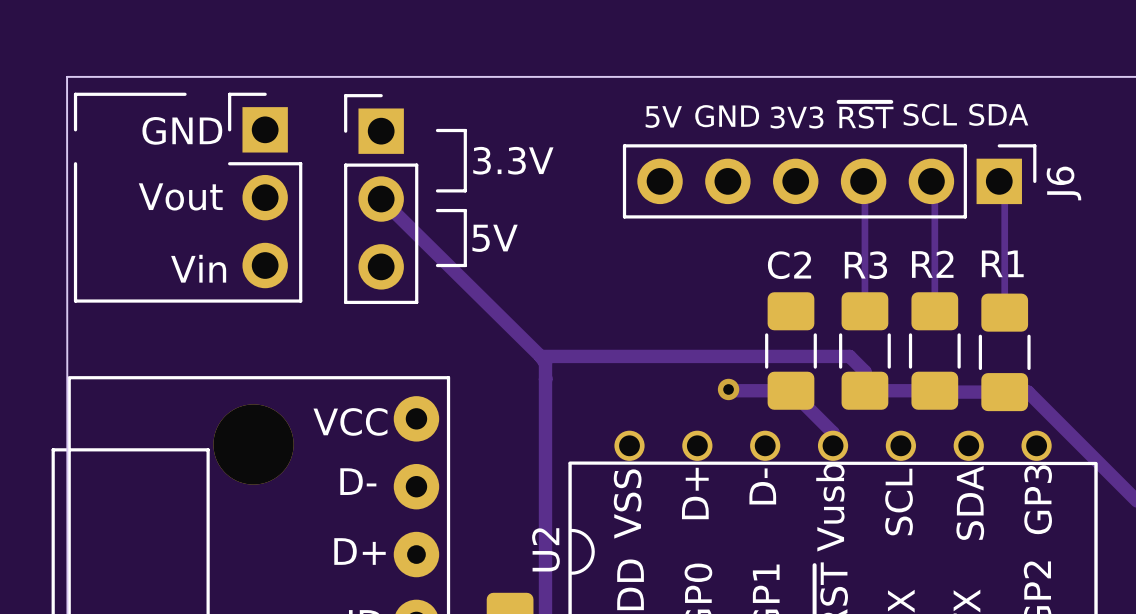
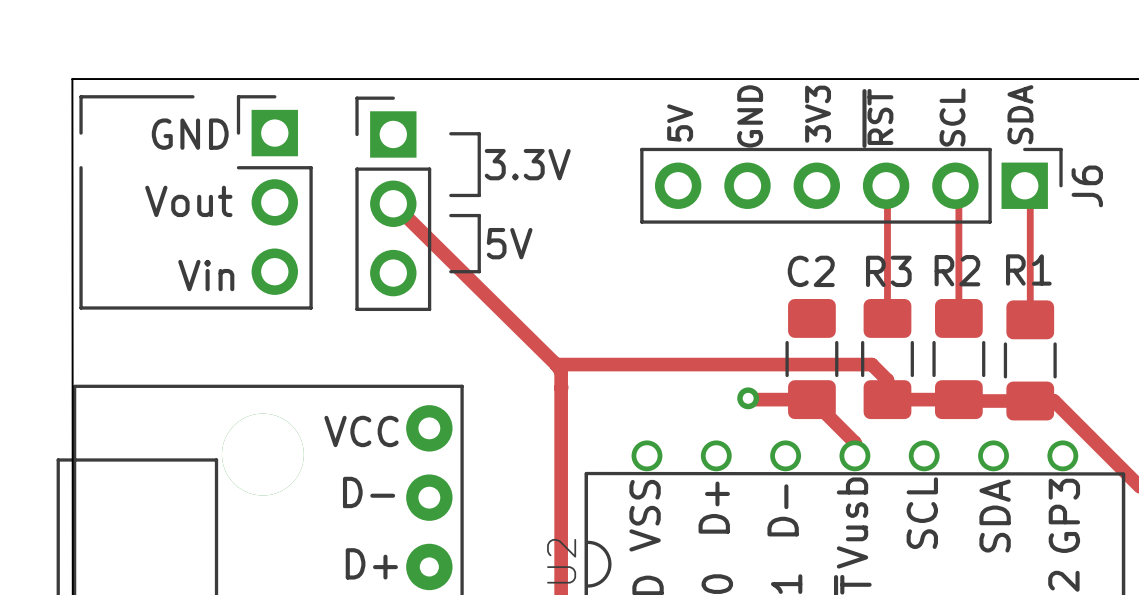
text rotation: 0° (930, 114) -> 90° counterclockwise (952, 117)
text rotation: 0° (998, 114) -> 90° counterclockwise (1020, 114)
text rotation: 0° (866, 115) -> 90° counterclockwise (877, 118)
text rotation: 0° (727, 116) -> 90° counterclockwise (750, 116)
text rotation: 0° (663, 117) -> 90° counterclockwise (680, 123)
text rotation: 0° (797, 117) -> 90° counterclockwise (818, 114)

